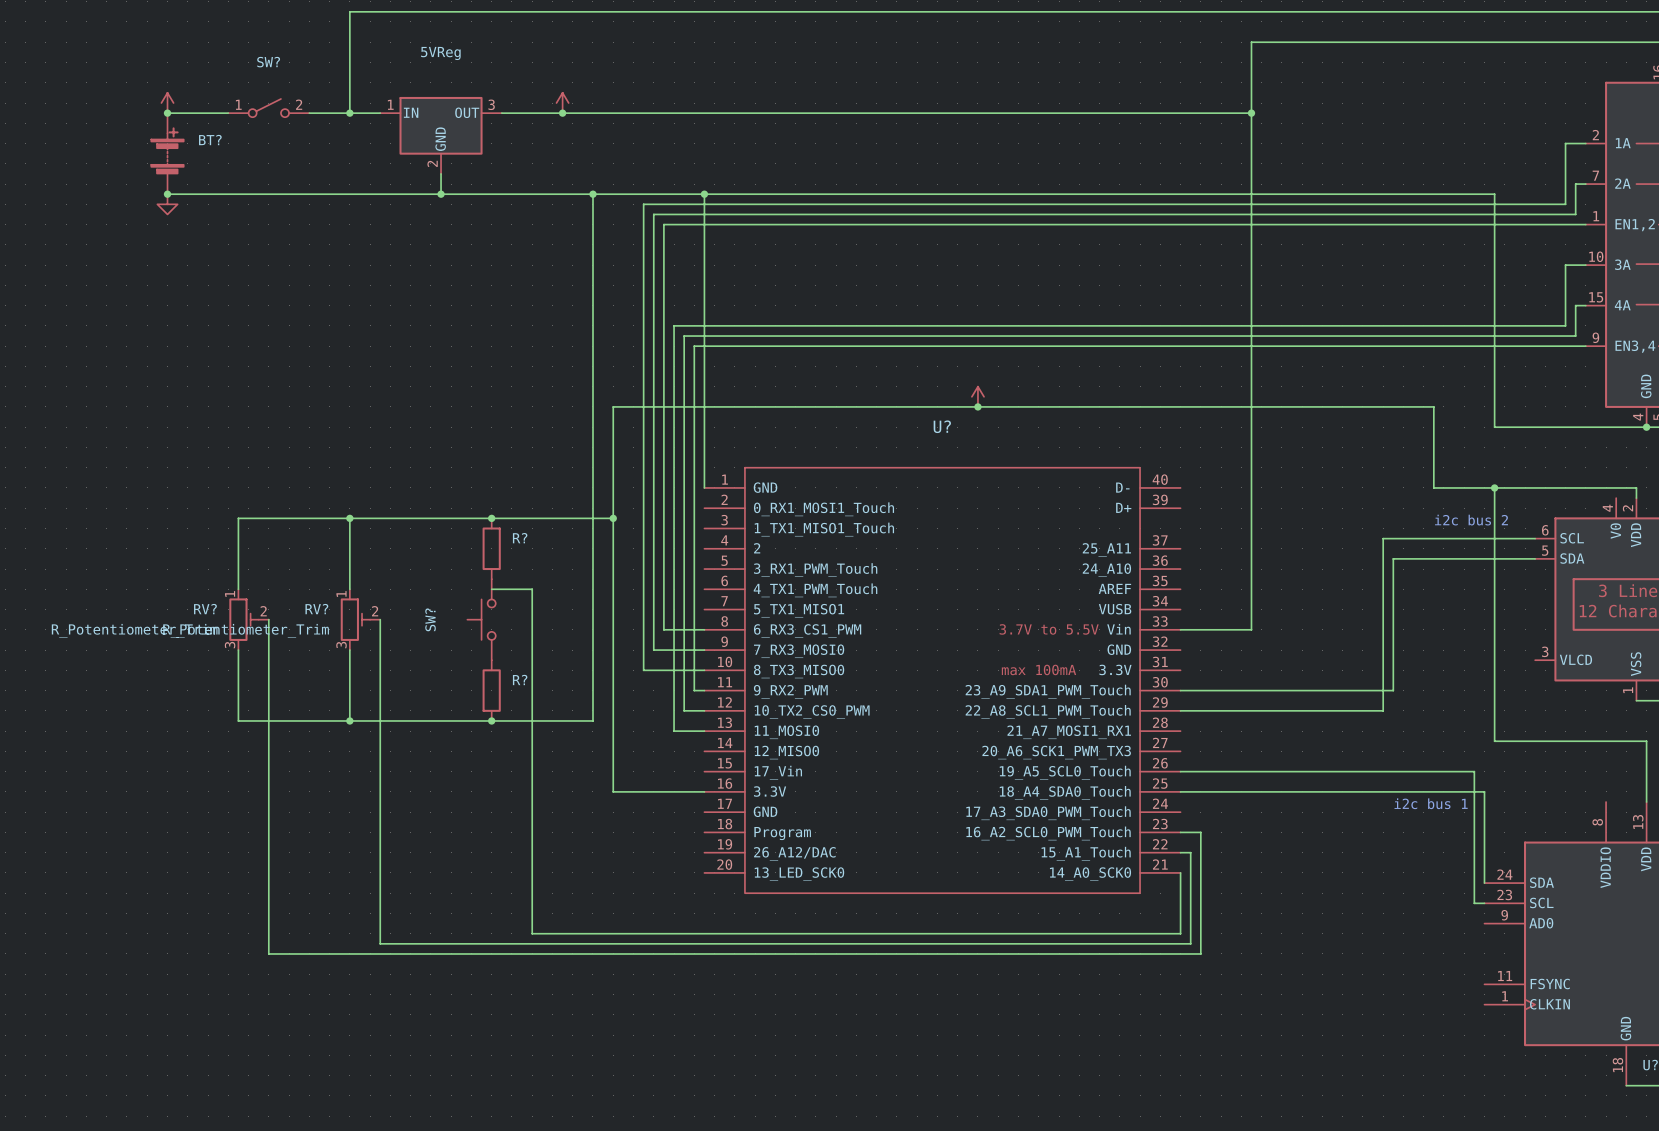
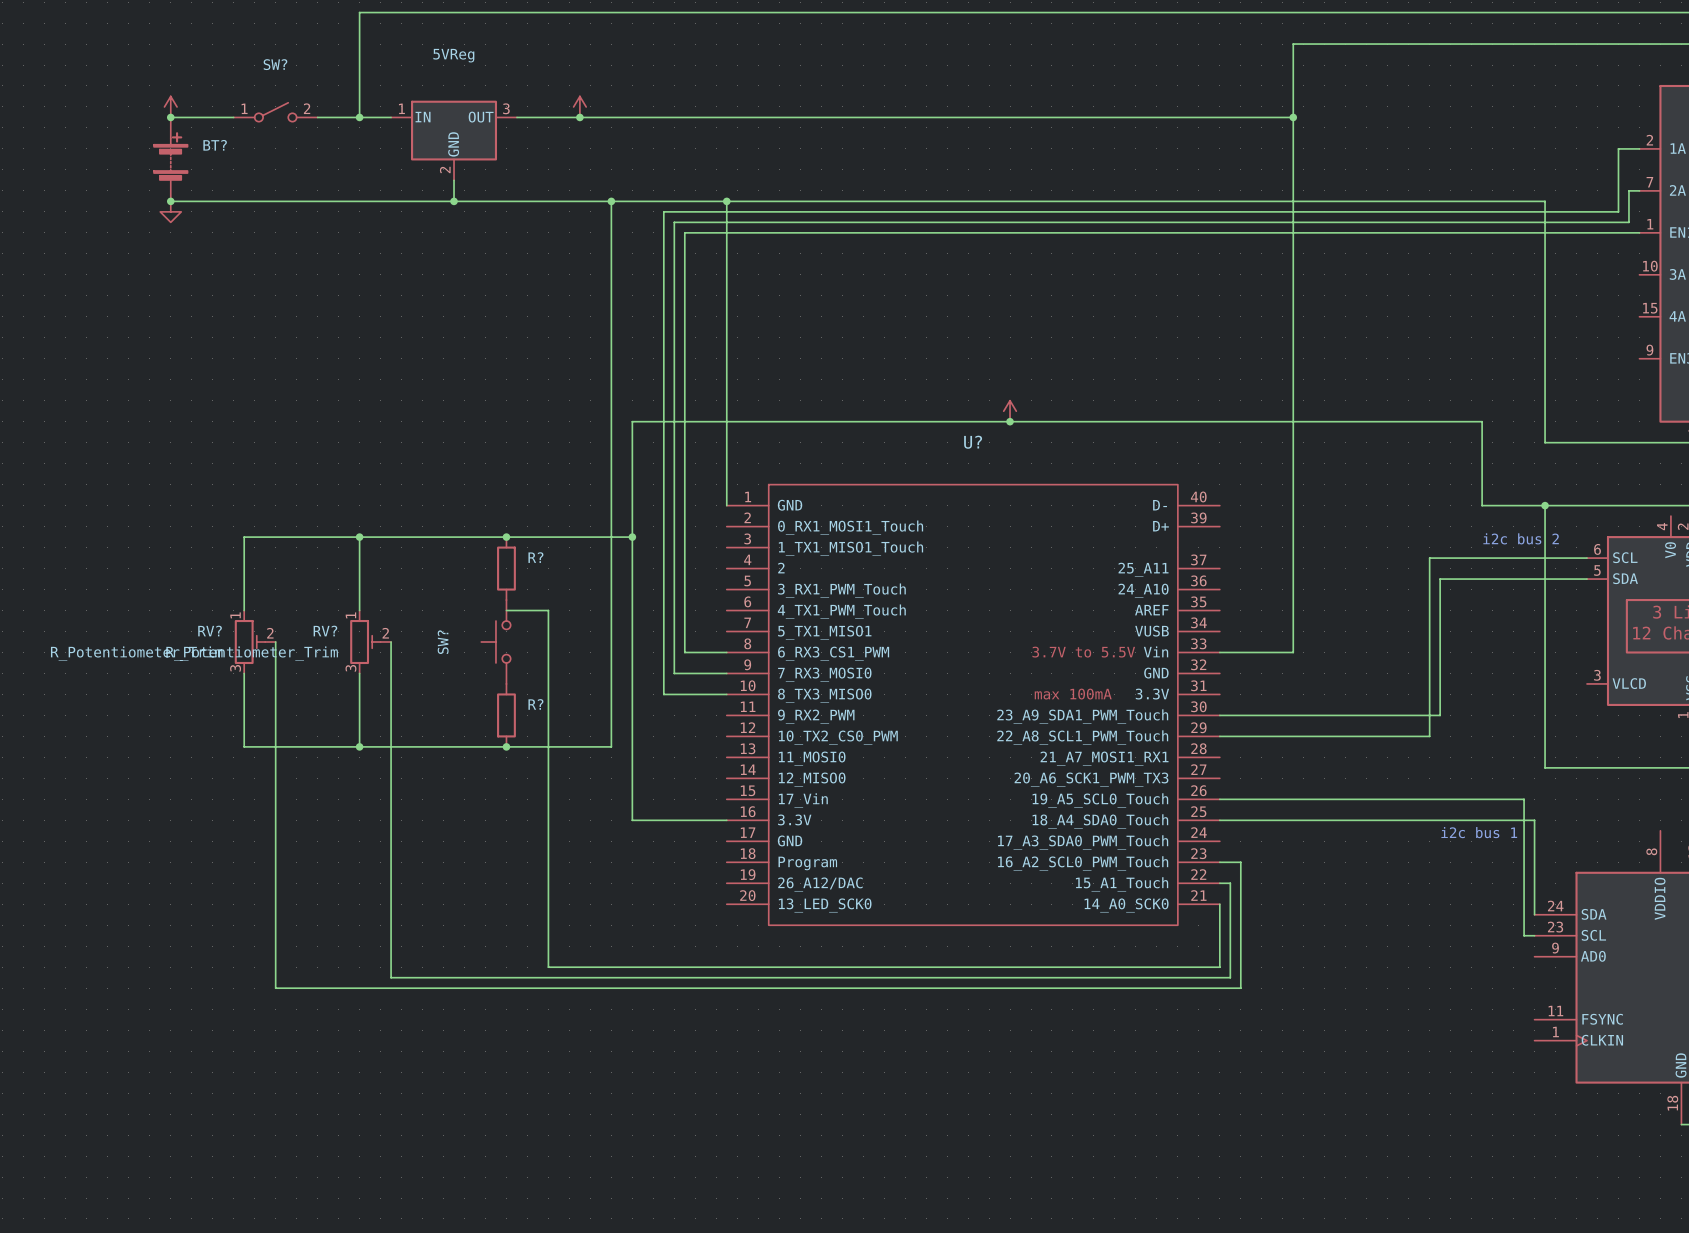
wire: (1585, 265) (1565, 265) (1565, 325) (674, 325) (674, 731) (704, 731) -> none
wire: (1585, 305) (1575, 305) (1575, 336) (684, 336) (684, 710) (704, 710) -> none
wire: (1585, 346) (694, 346) (694, 690) (704, 690) -> none

